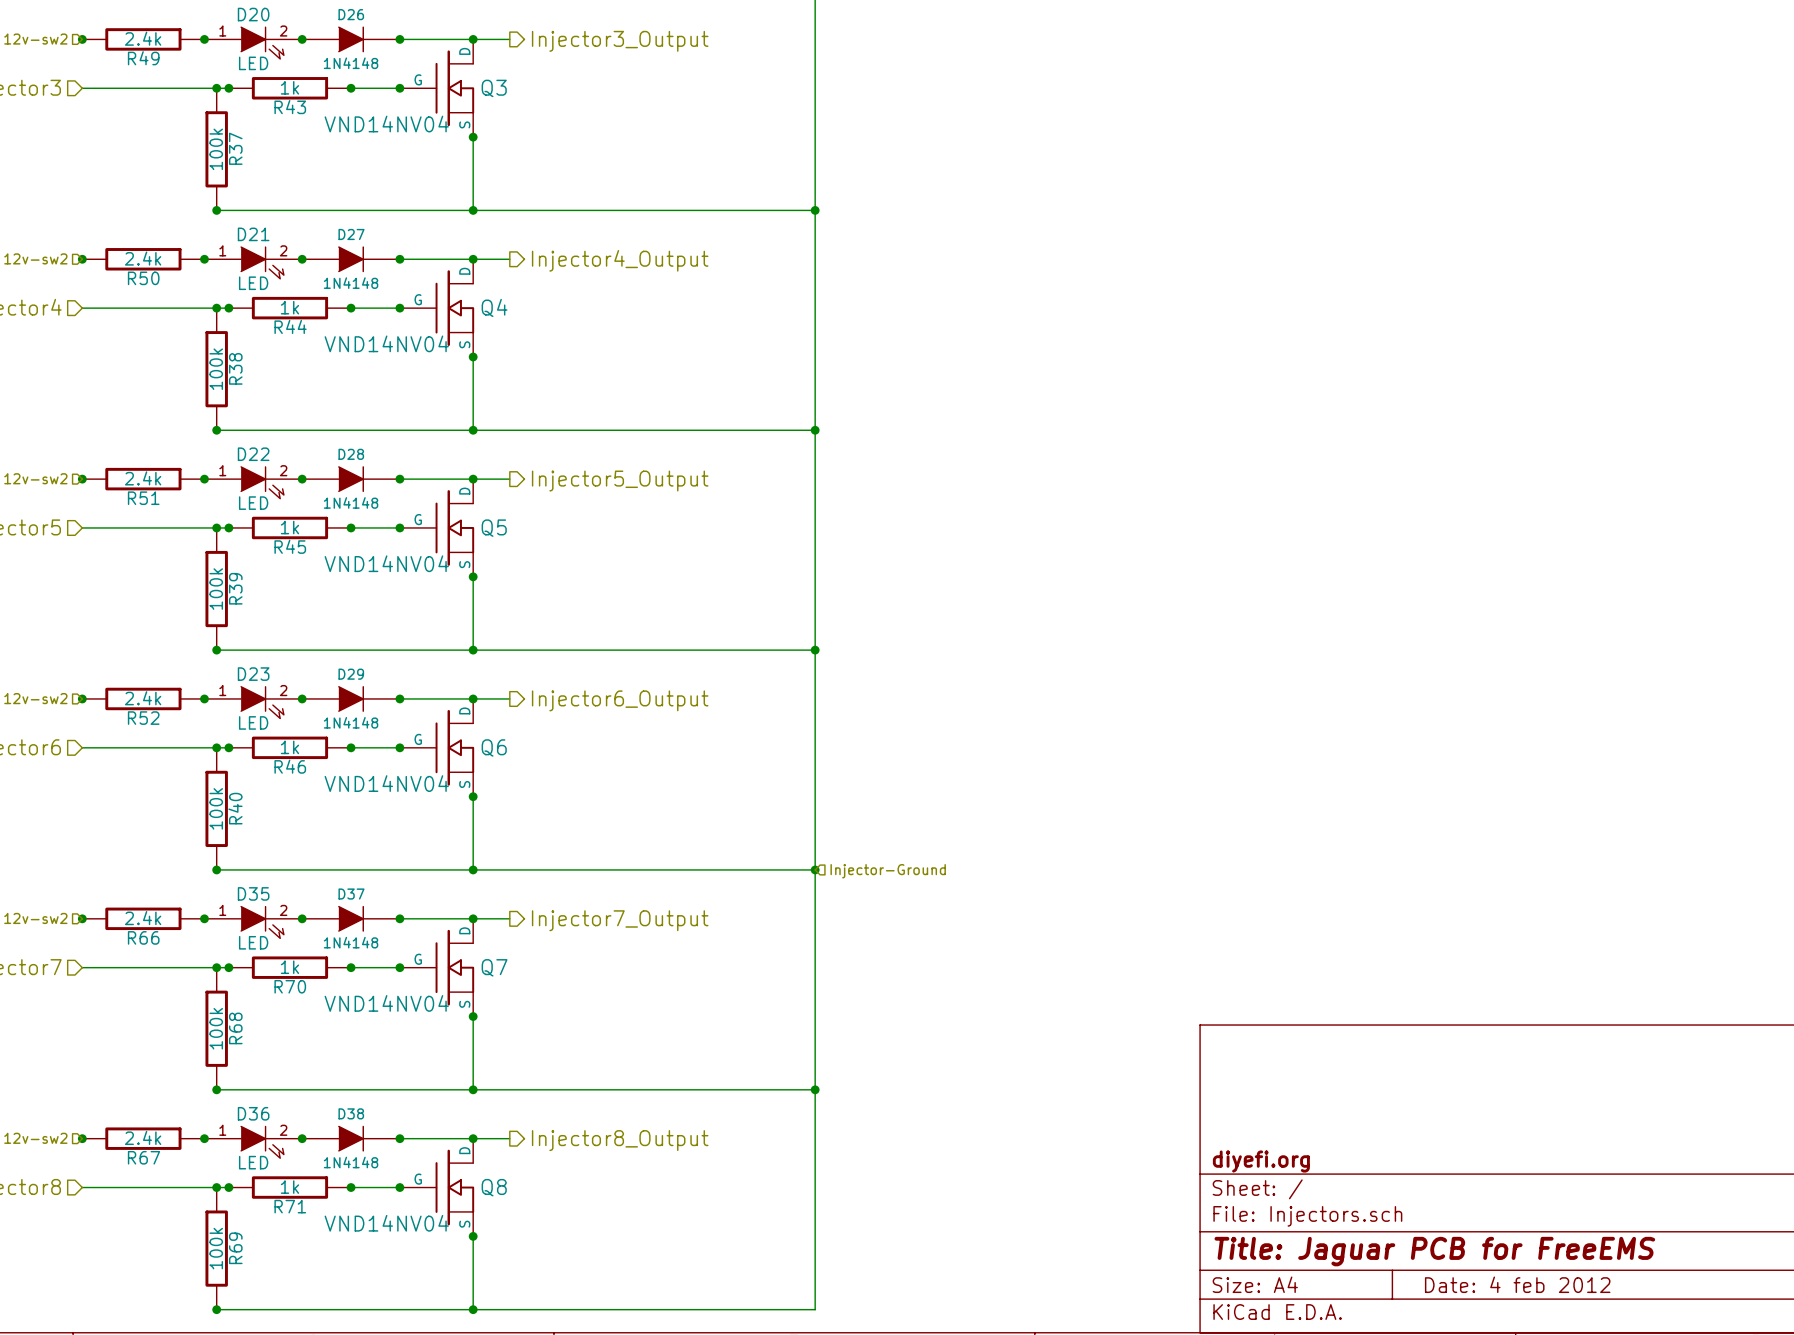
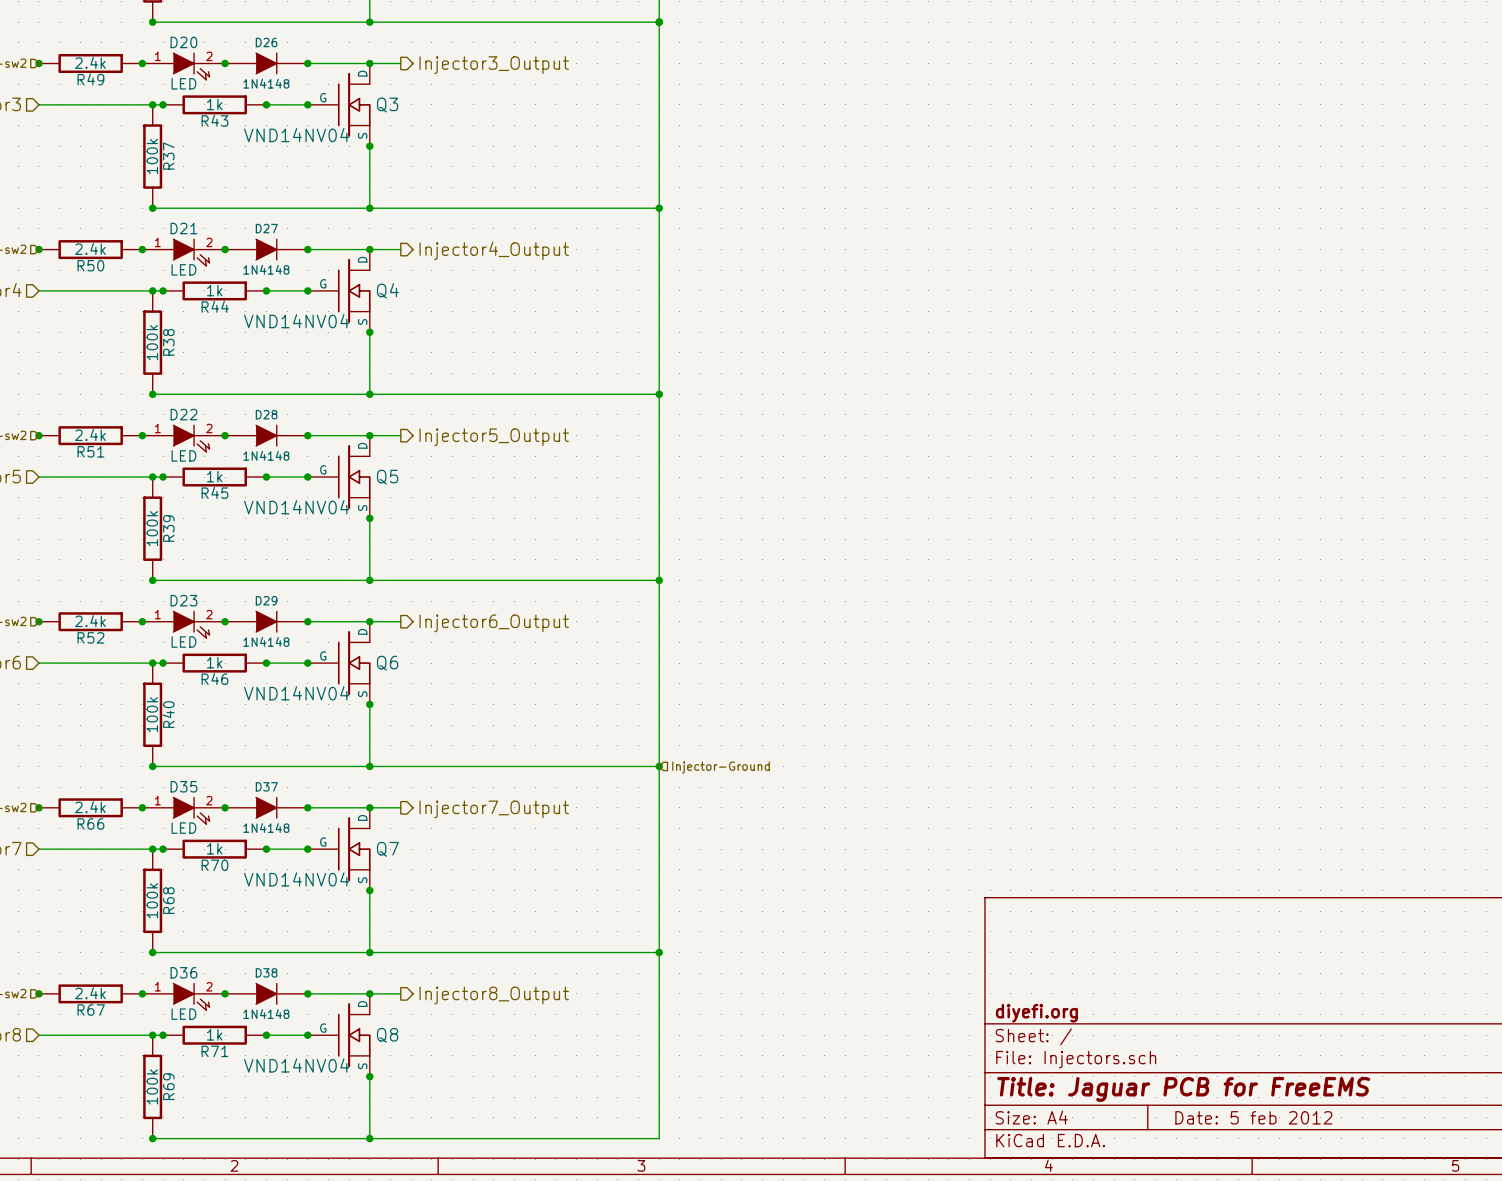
title block: Date: 4 feb 2012 (1517, 1284) -> Date: 5 feb 2012 (1253, 1117)

